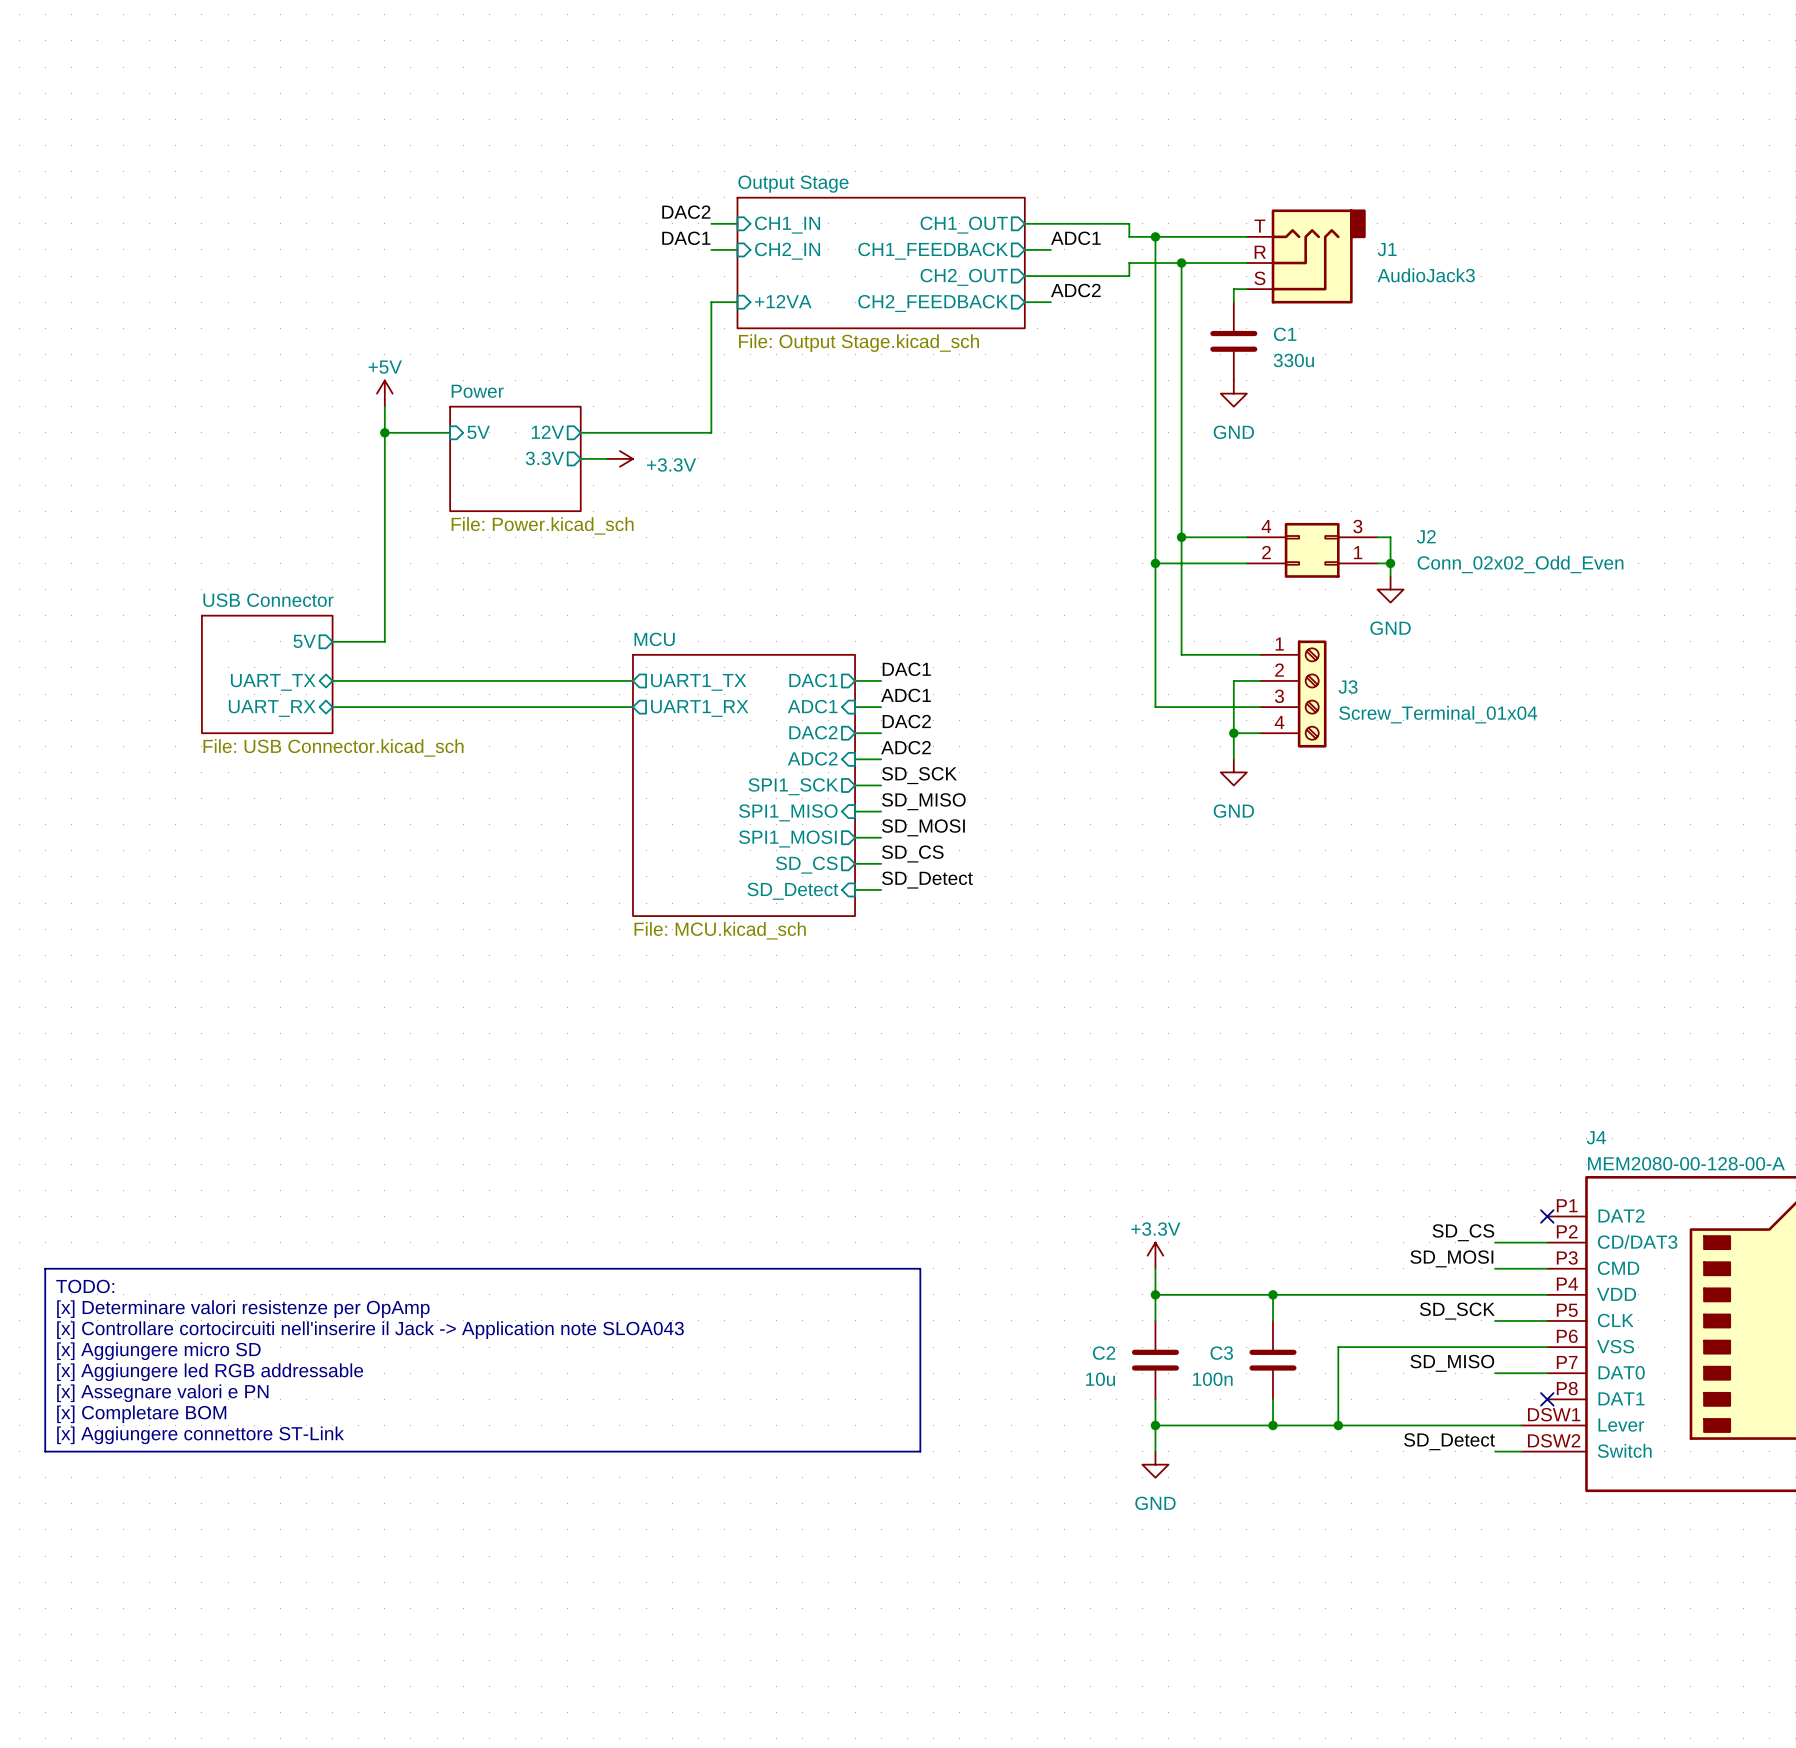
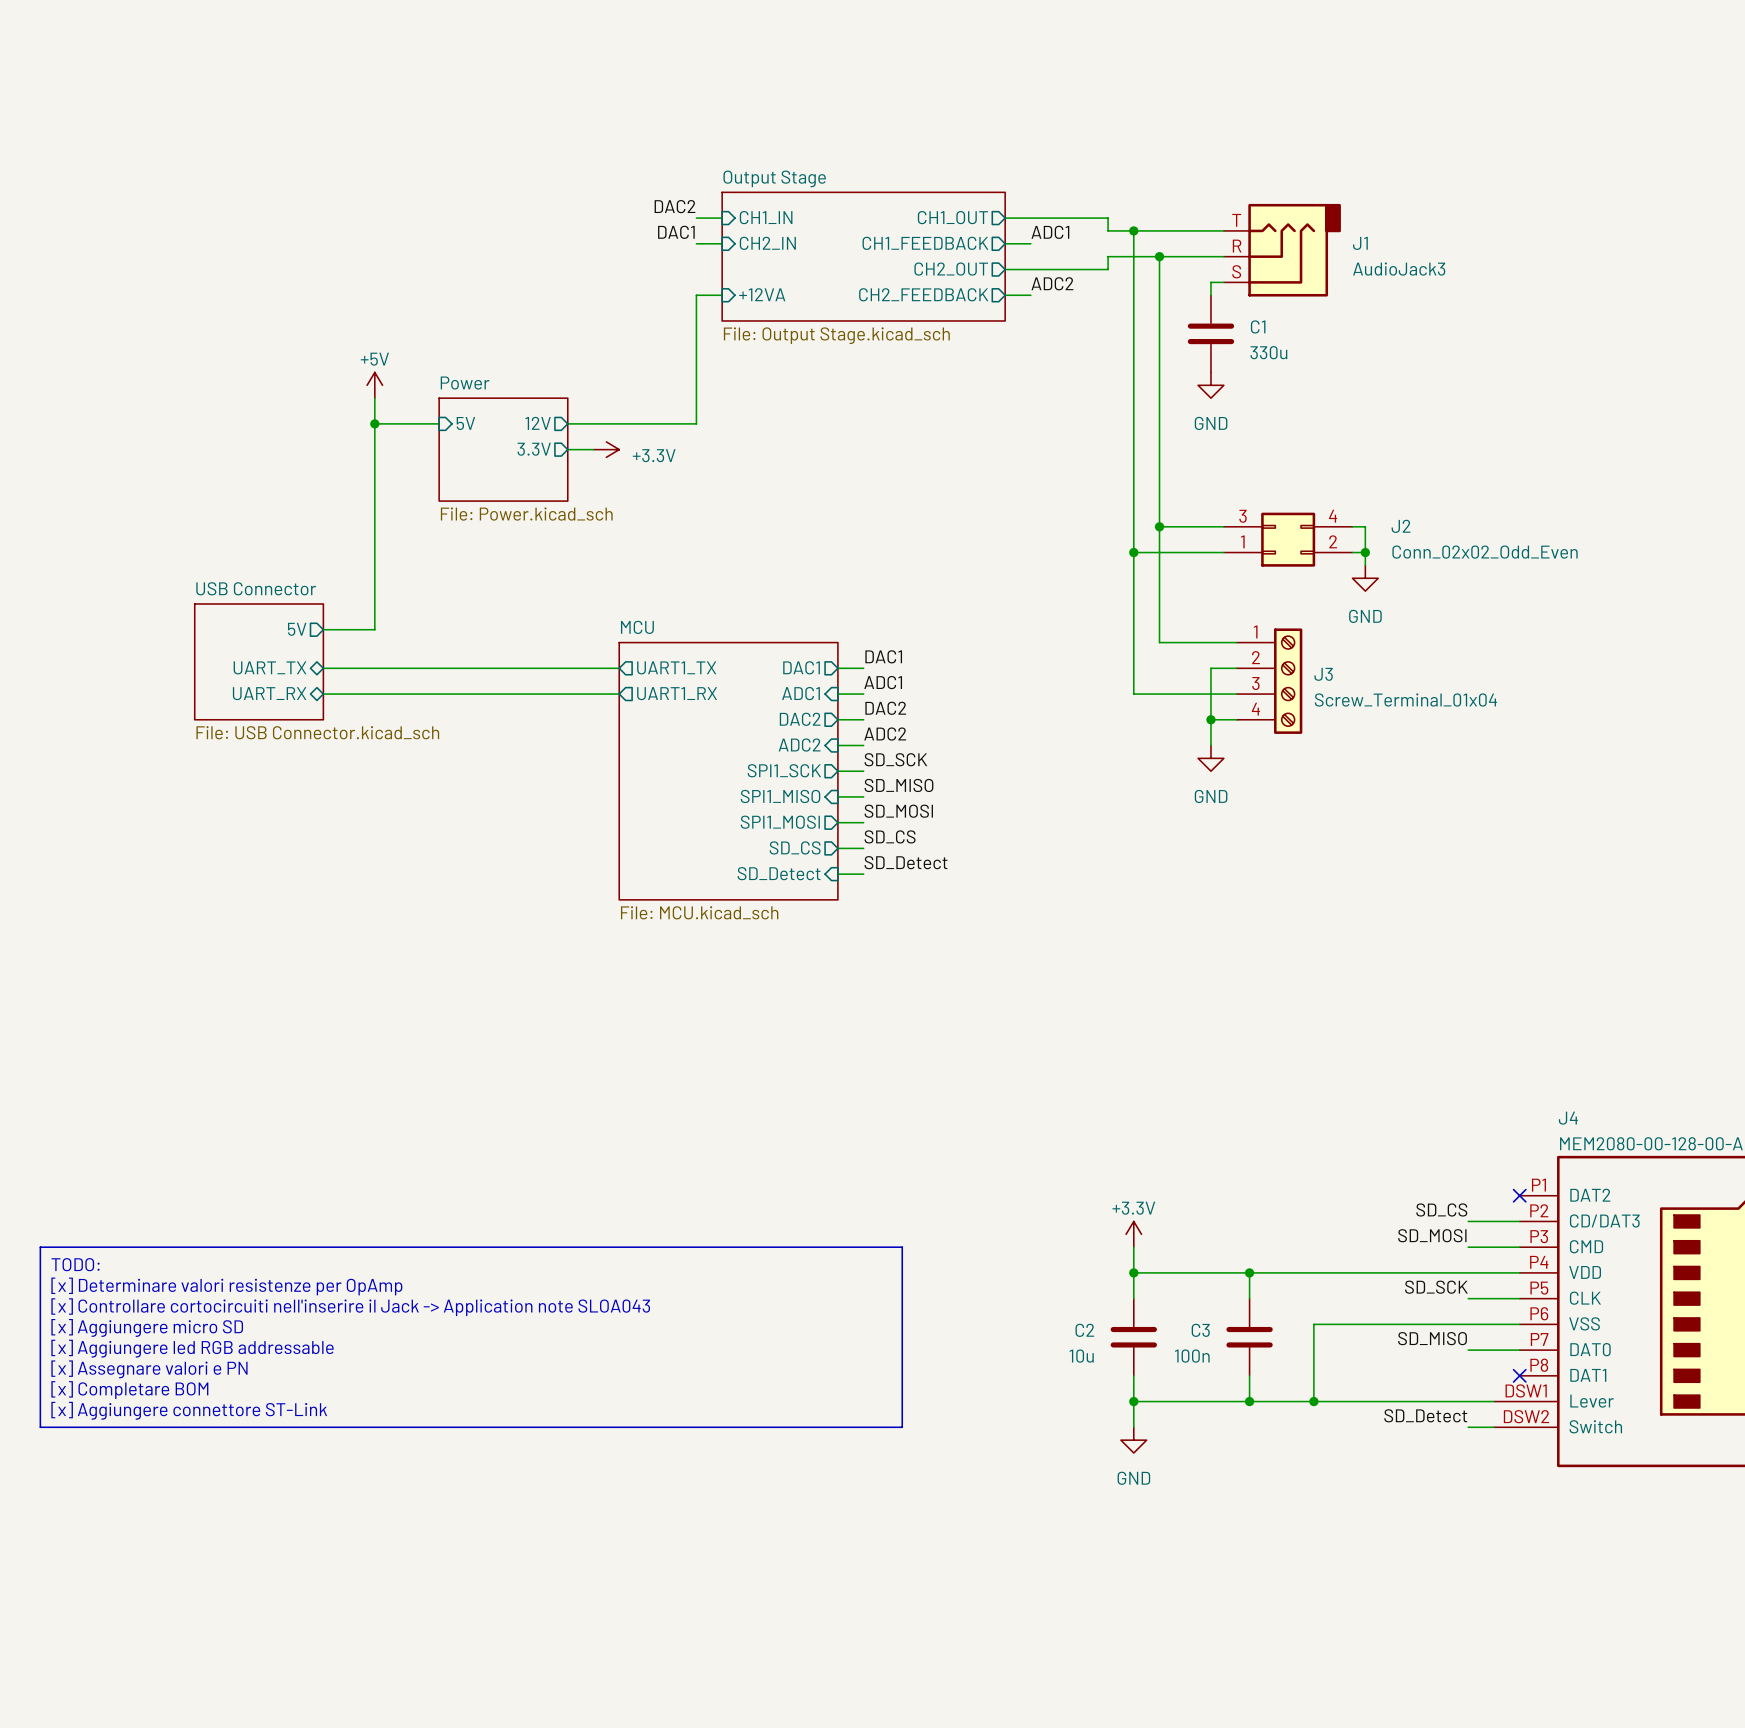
J2 flip: as is (1312, 550) -> left-right (1288, 539)

